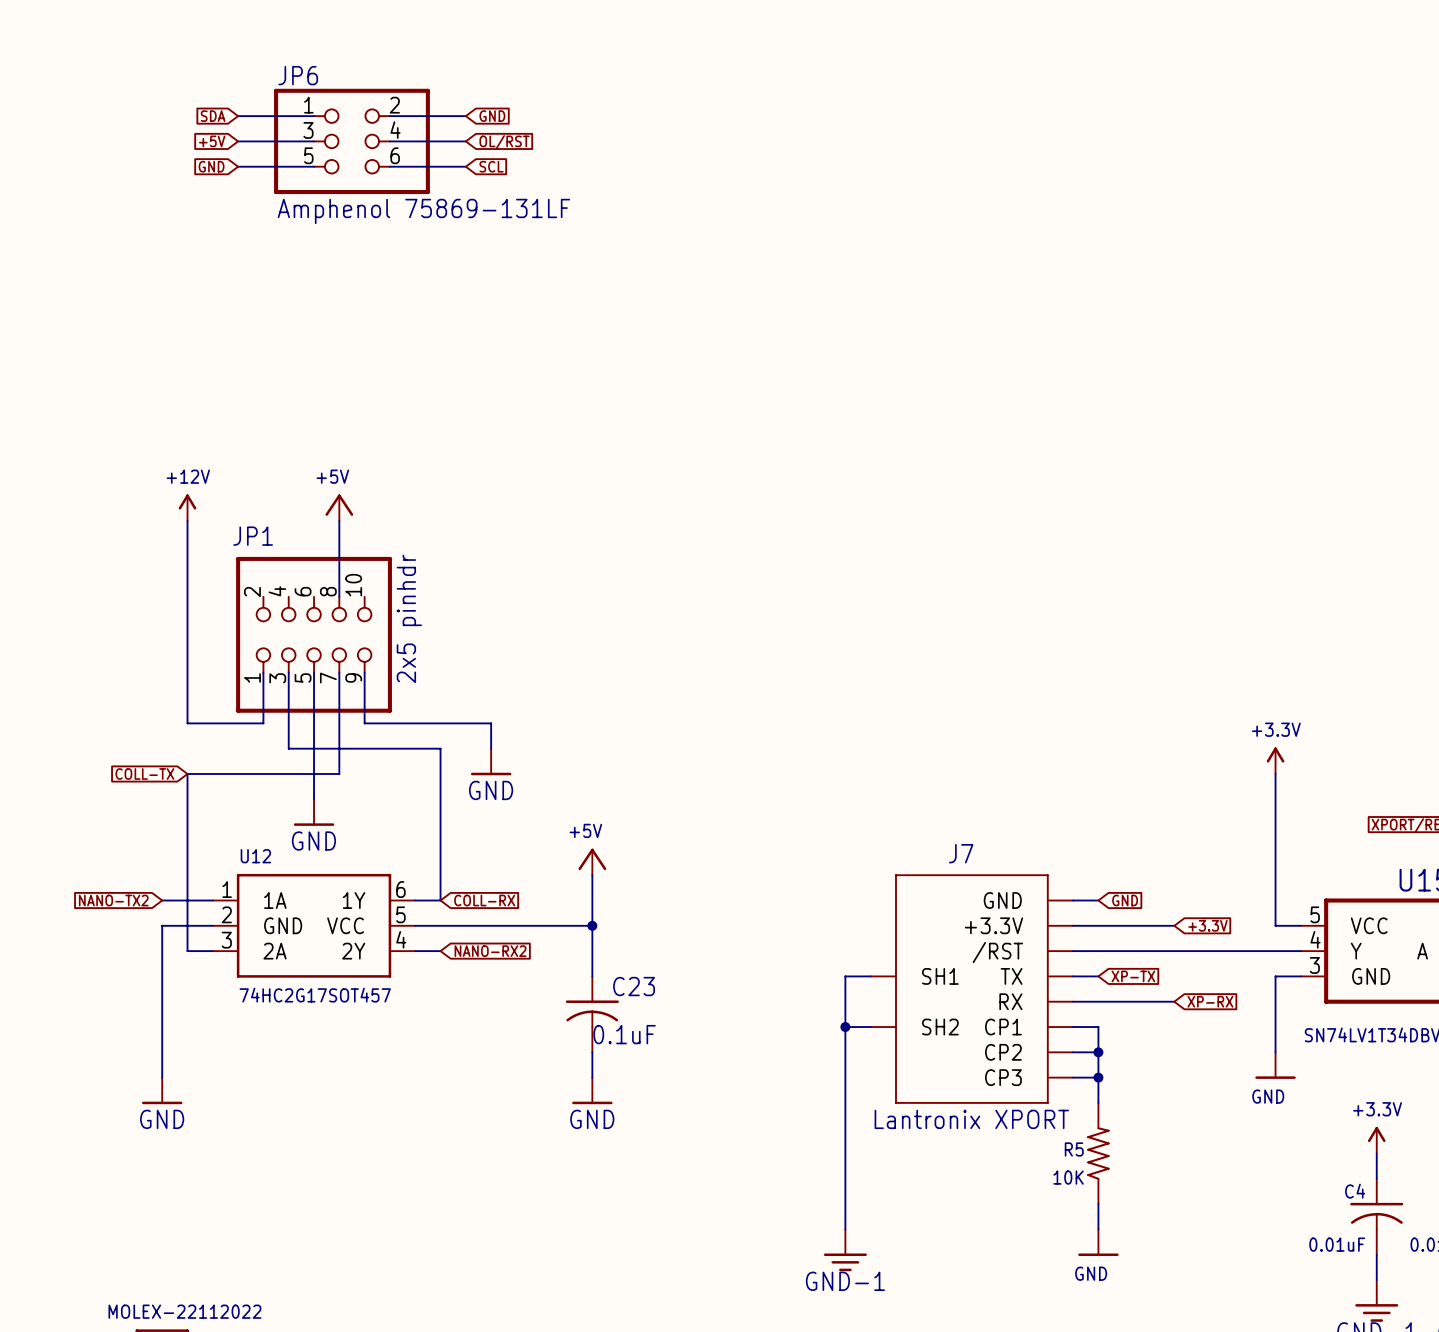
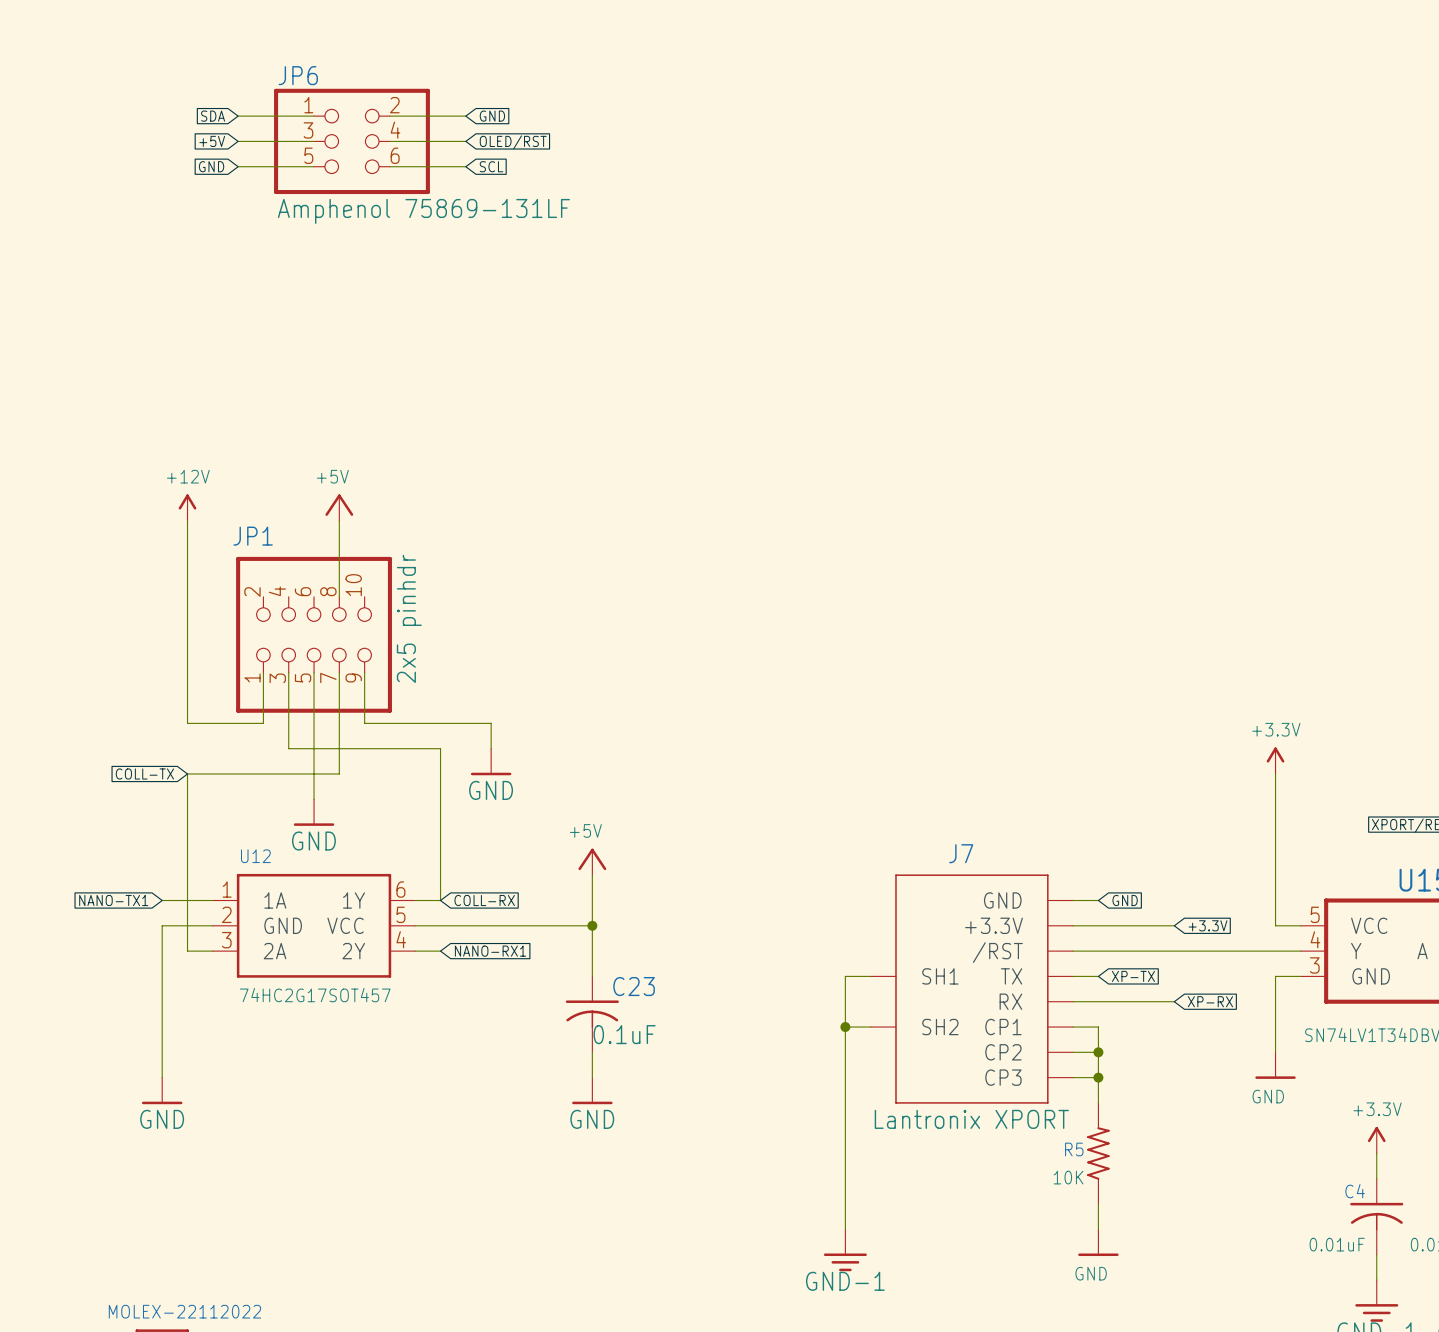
global label: OL/RST (504, 142) -> OLED/RST (513, 142)
global label: NANO-TX2 (113, 900) -> NANO-TX1 (113, 900)
global label: NANO-RX2 (490, 951) -> NANO-RX1 (490, 951)

